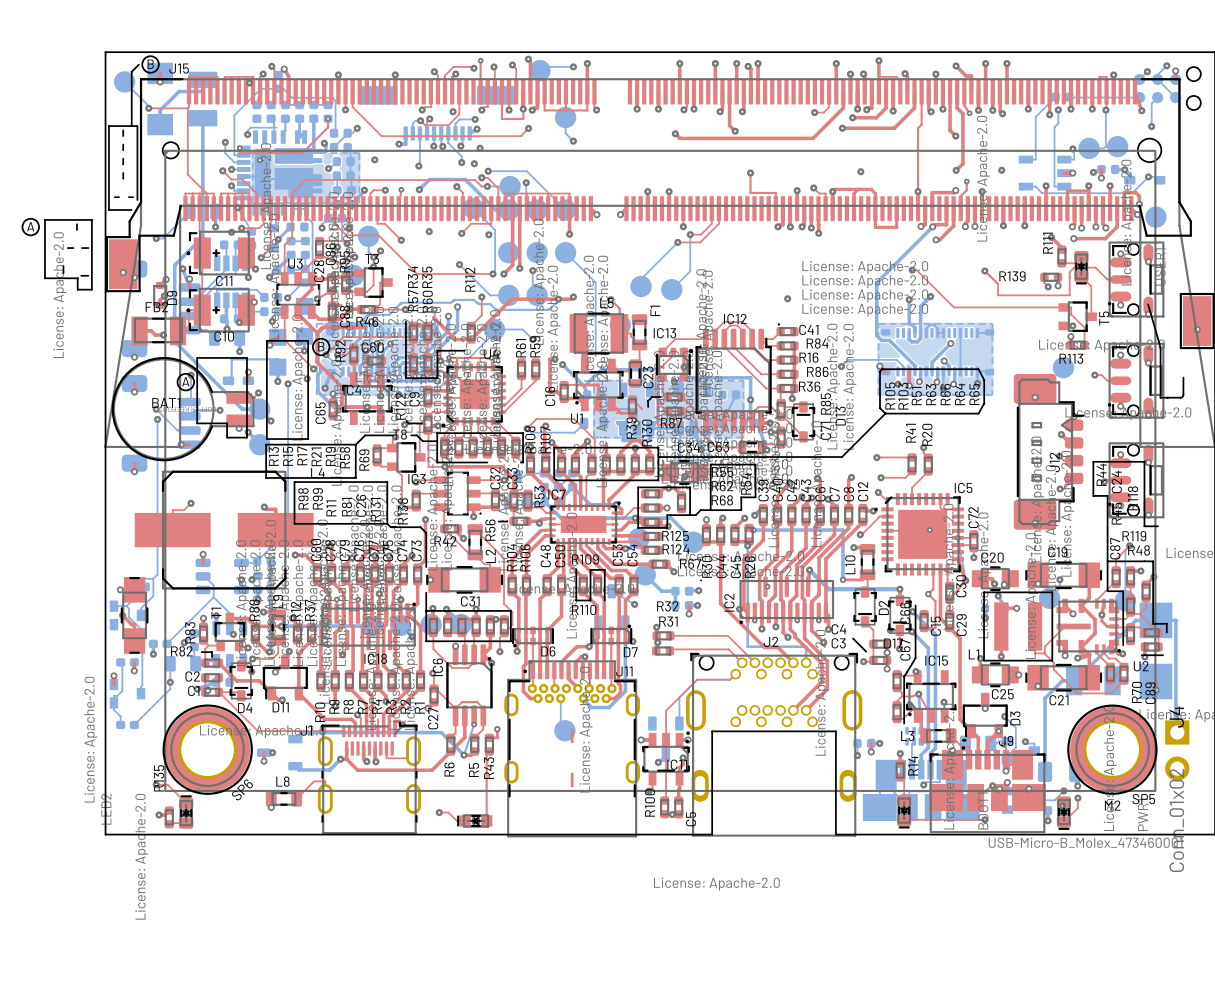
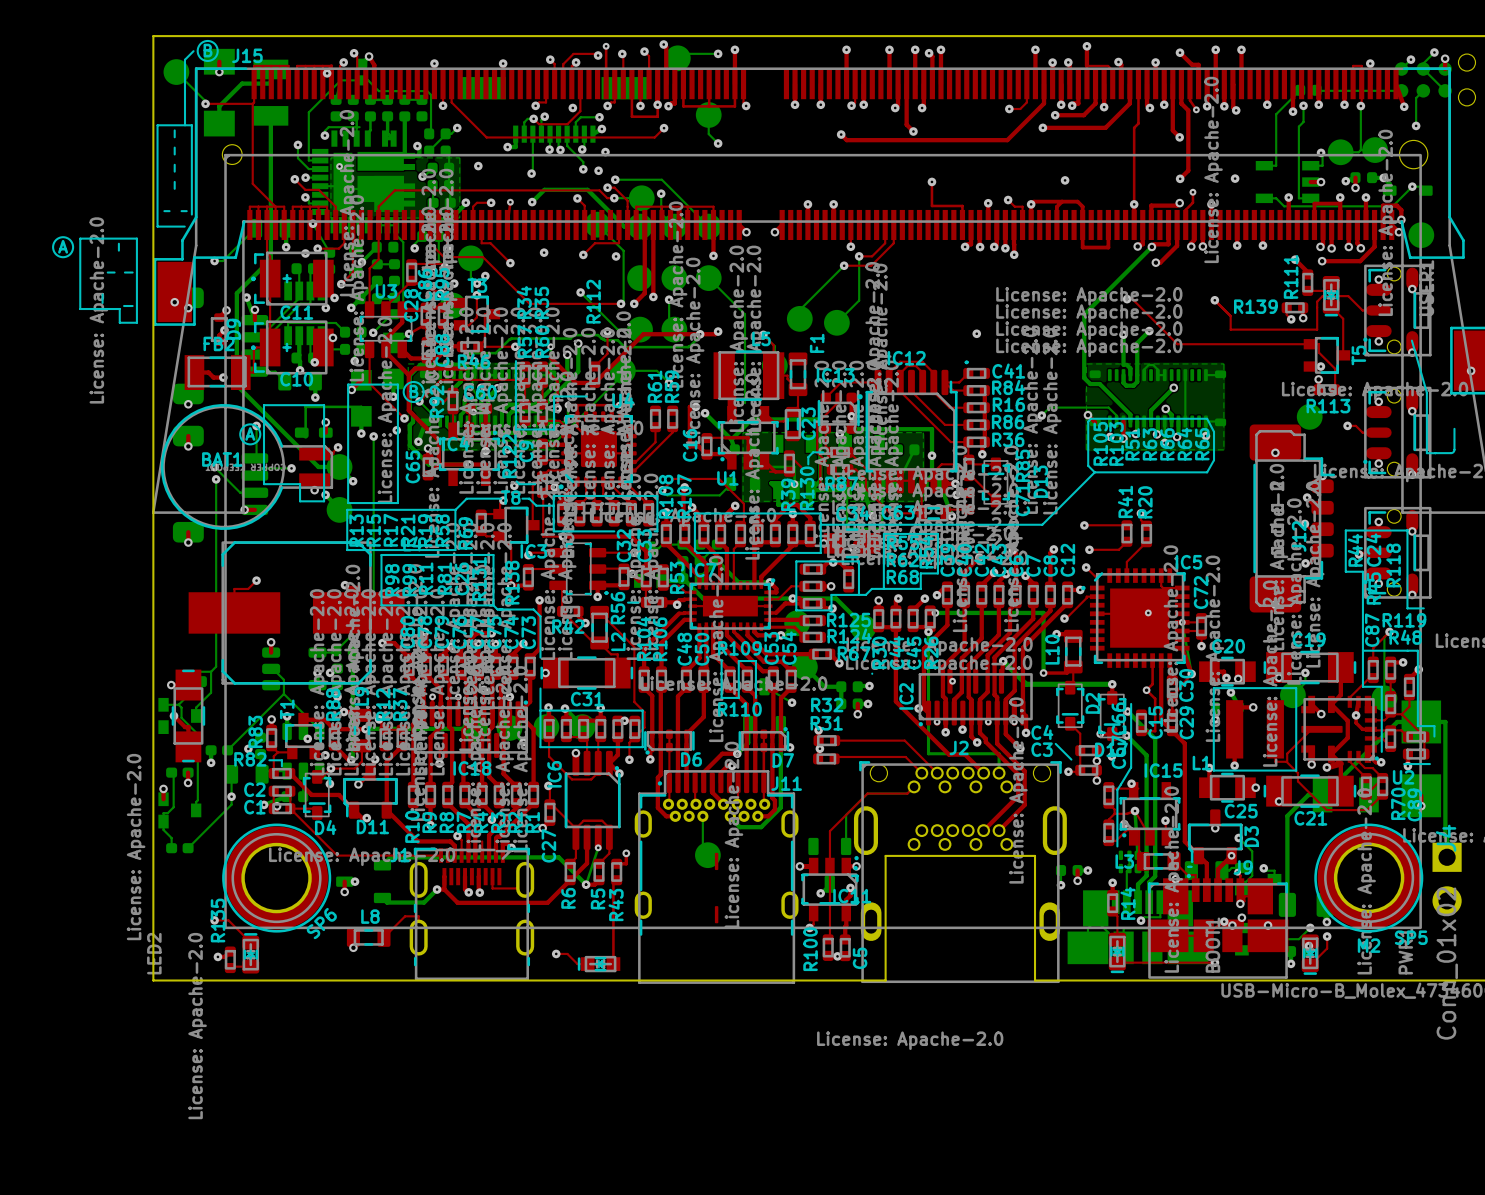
top track: (328, 118) (328, 127) (302, 153) (239, 153) (239, 148) -> none
via: (328, 118) -> none
via: (239, 148) -> none

